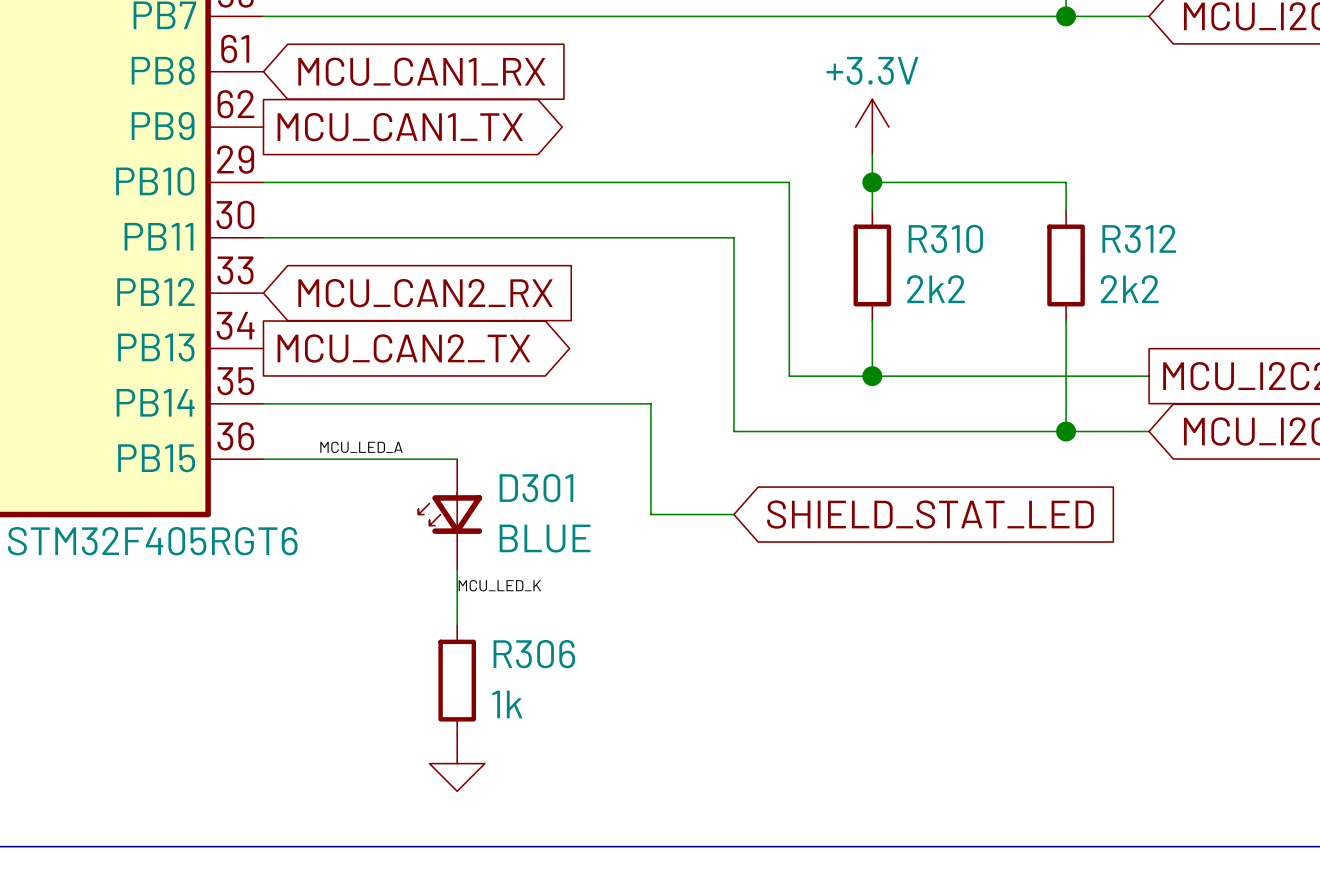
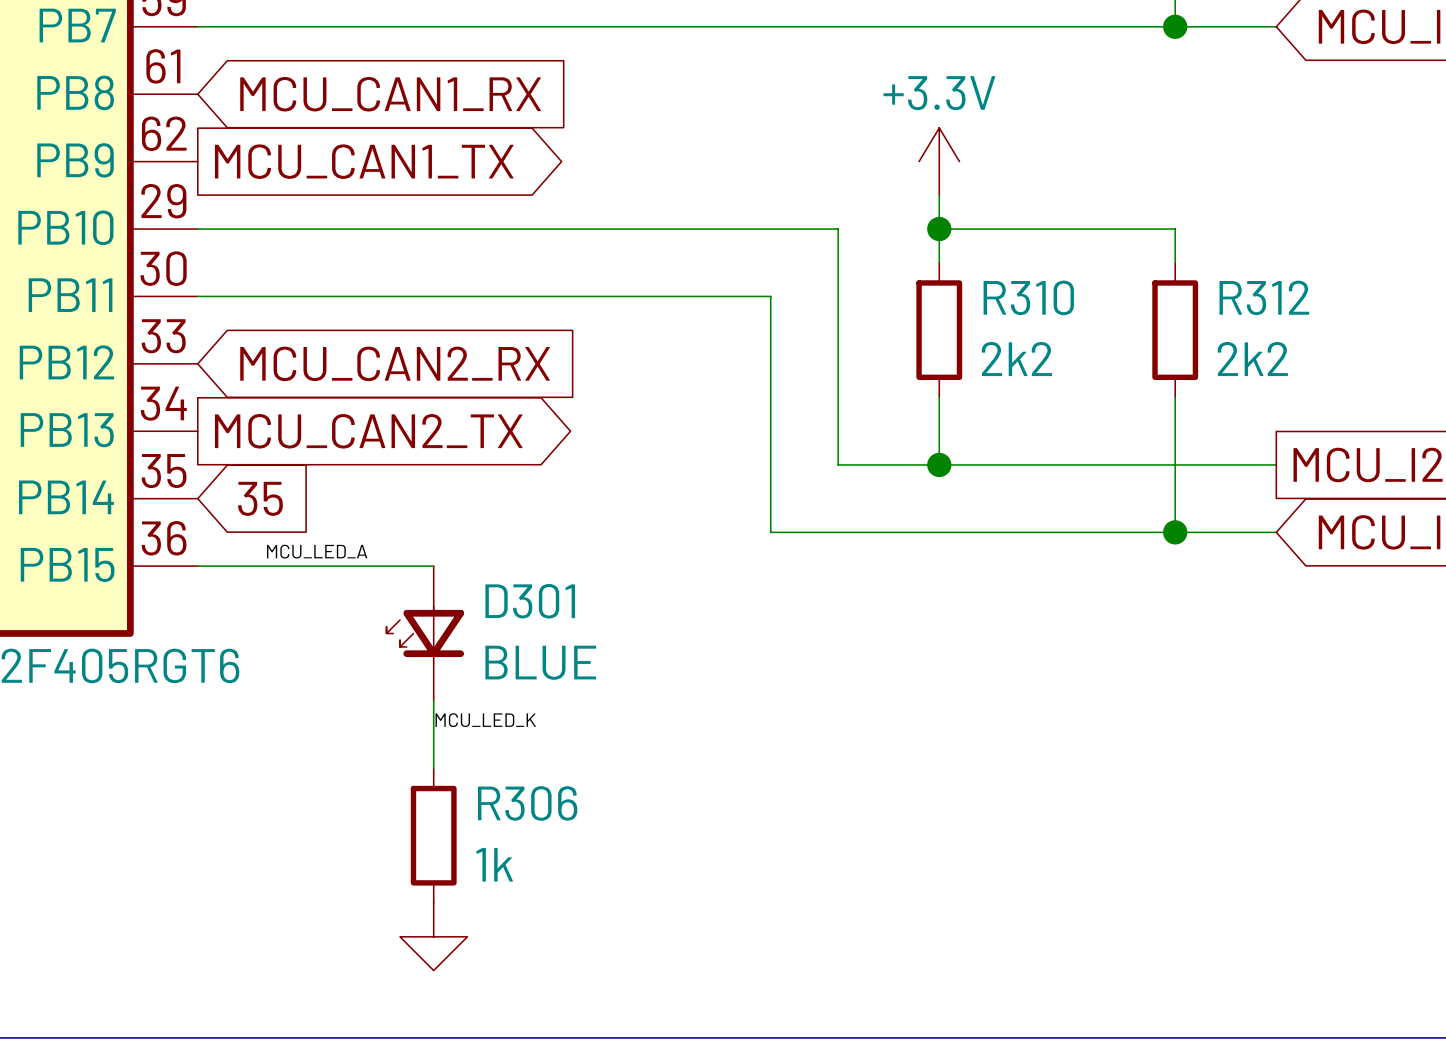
wire: (263, 403) (650, 403) (650, 514) (733, 514) -> none
global label: none -> 35 (260, 498)
global label: SHIELD_STAT_LED (930, 514) -> none

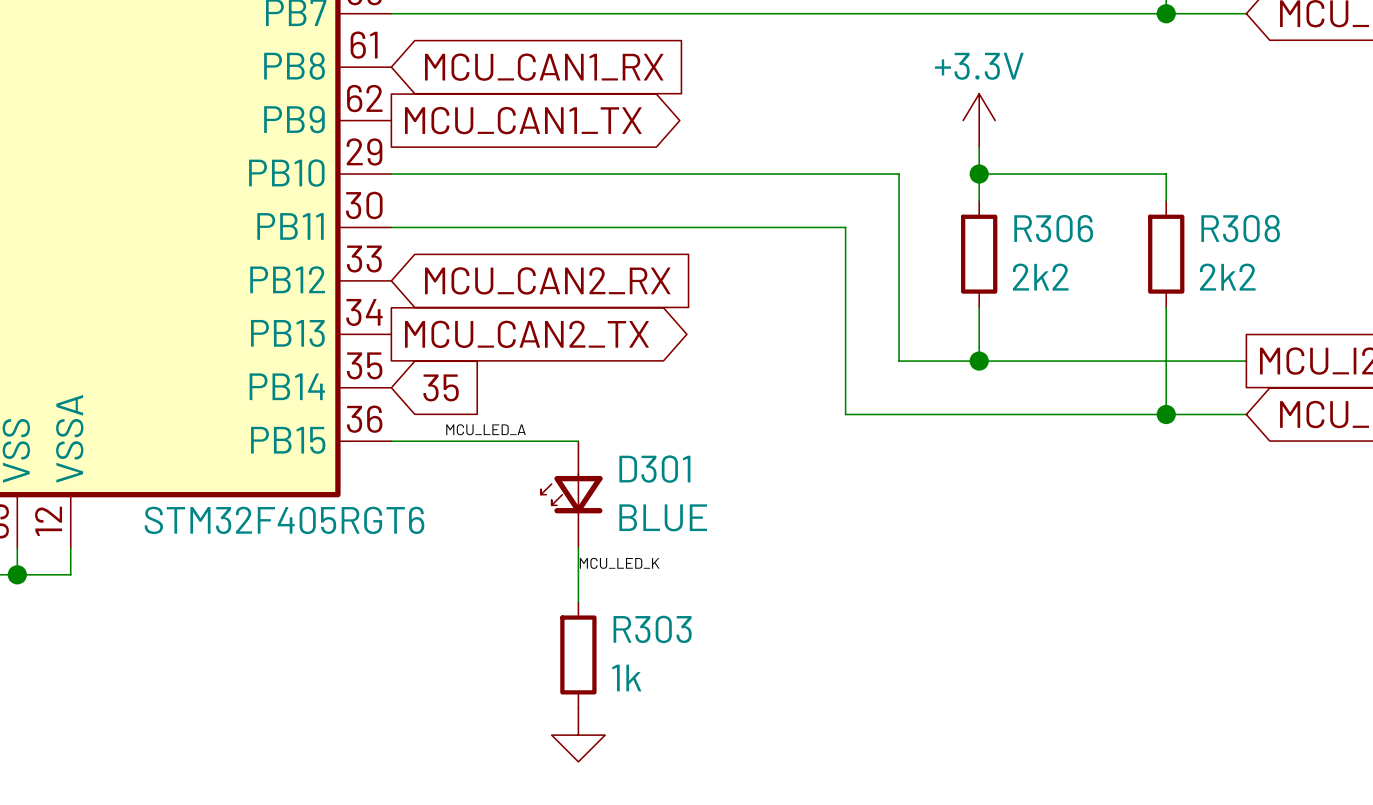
R310 name: R310 (1028, 297) -> R306 (1053, 228)
R312 name: R312 (1264, 297) -> R308 (1240, 228)
R306 name: R306 (527, 803) -> R303 (652, 629)

